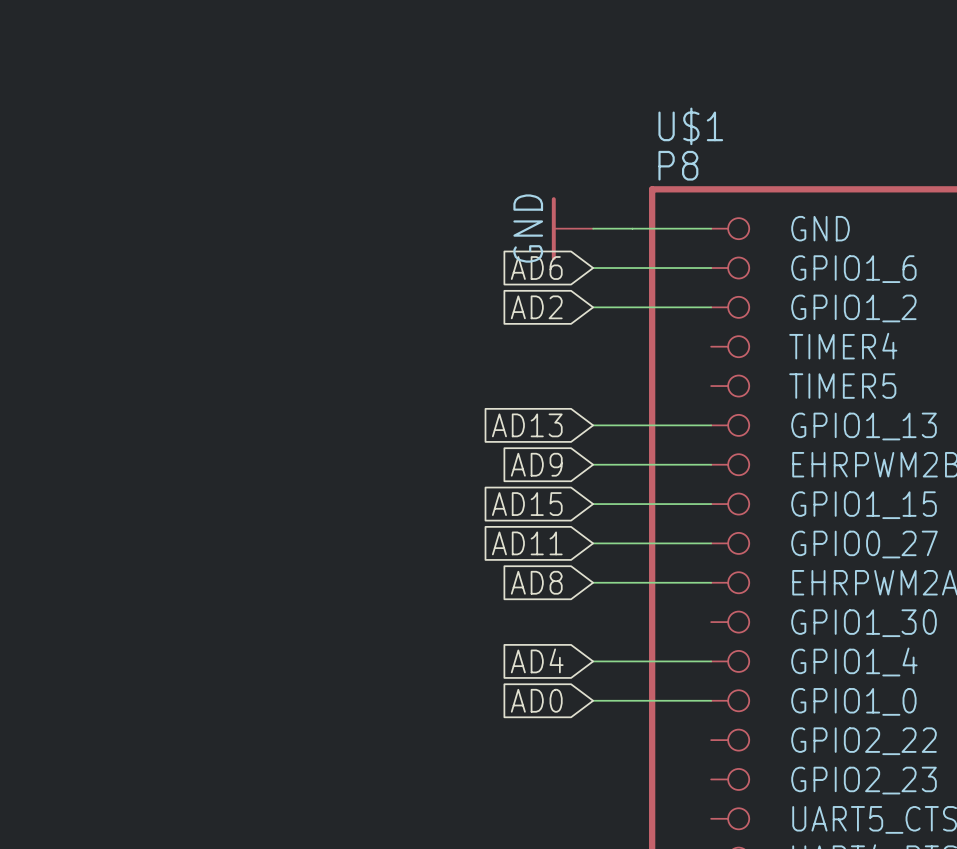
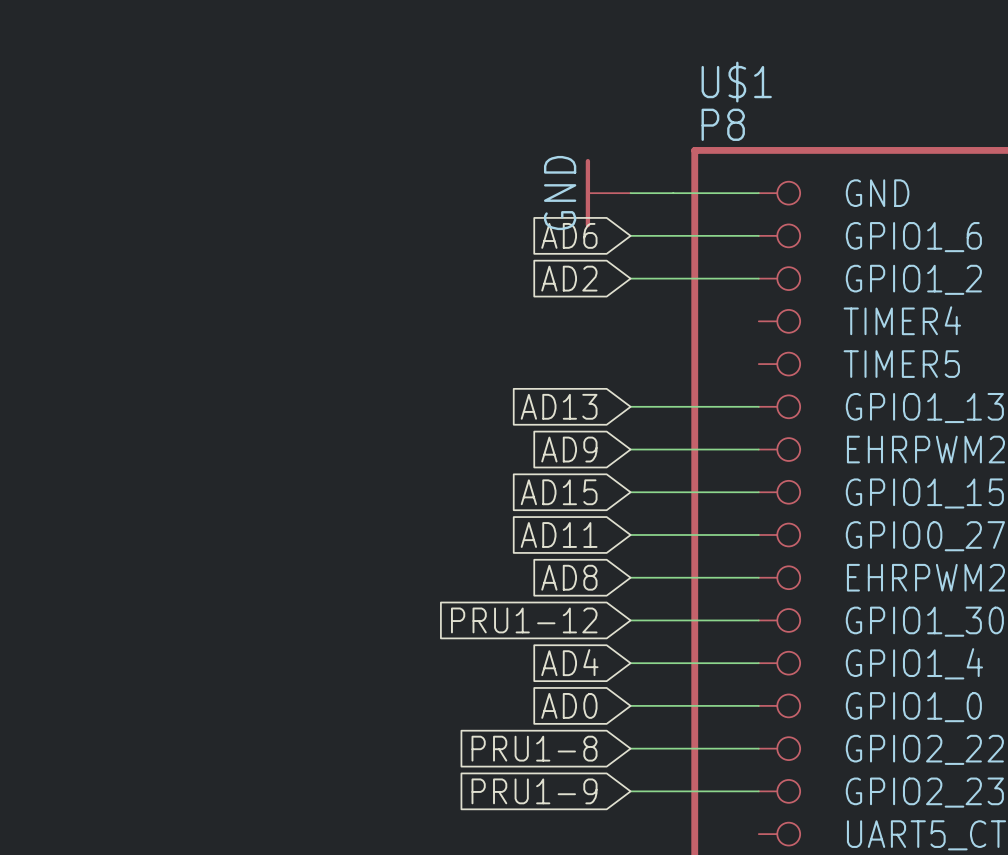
global label: none -> PRU1-12 (524, 620)
wire: none -> (630, 620) (758, 620)
global label: none -> PRU1-8 (534, 748)
wire: none -> (630, 748) (758, 748)
global label: none -> PRU1-9 (534, 791)
wire: none -> (630, 791) (758, 791)

